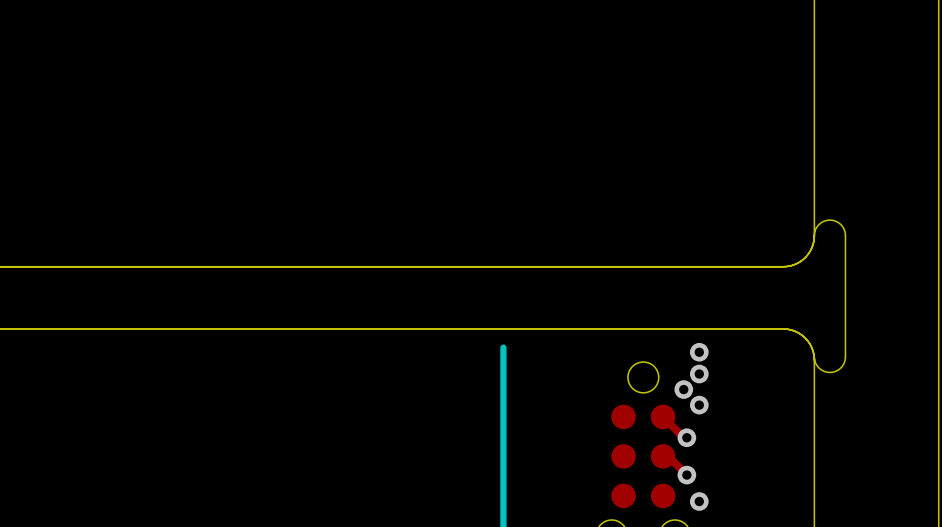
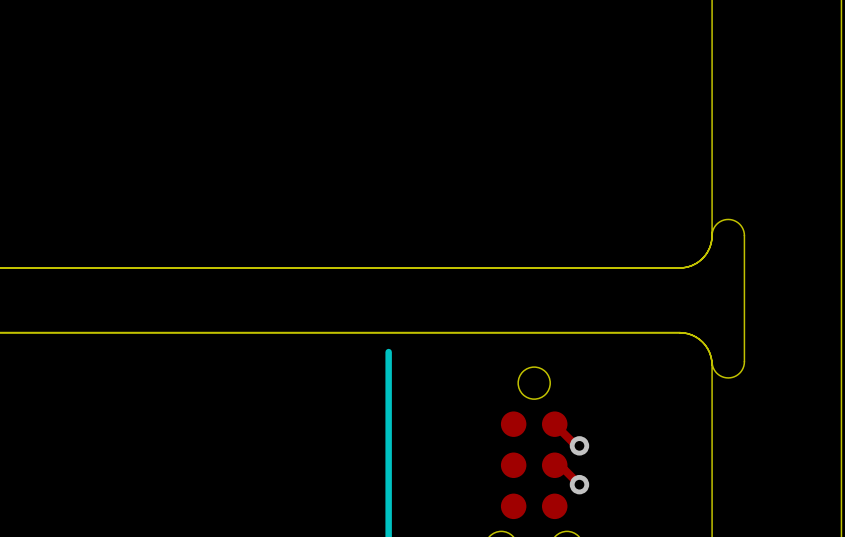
via: (699, 352) -> none
via: (699, 374) -> none
via: (683, 389) -> none
via: (699, 405) -> none
via: (699, 501) -> none

